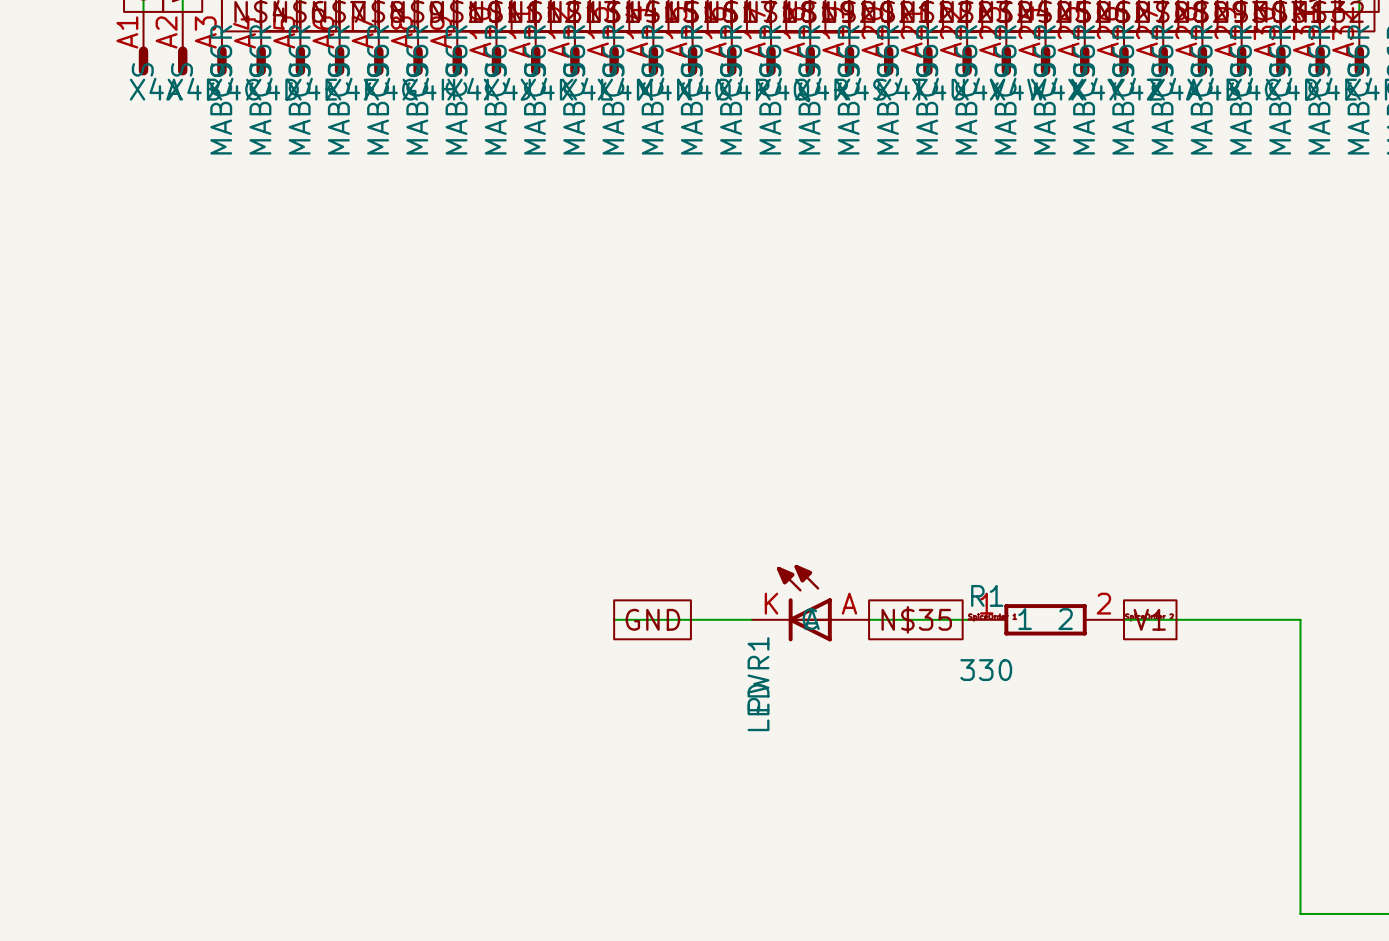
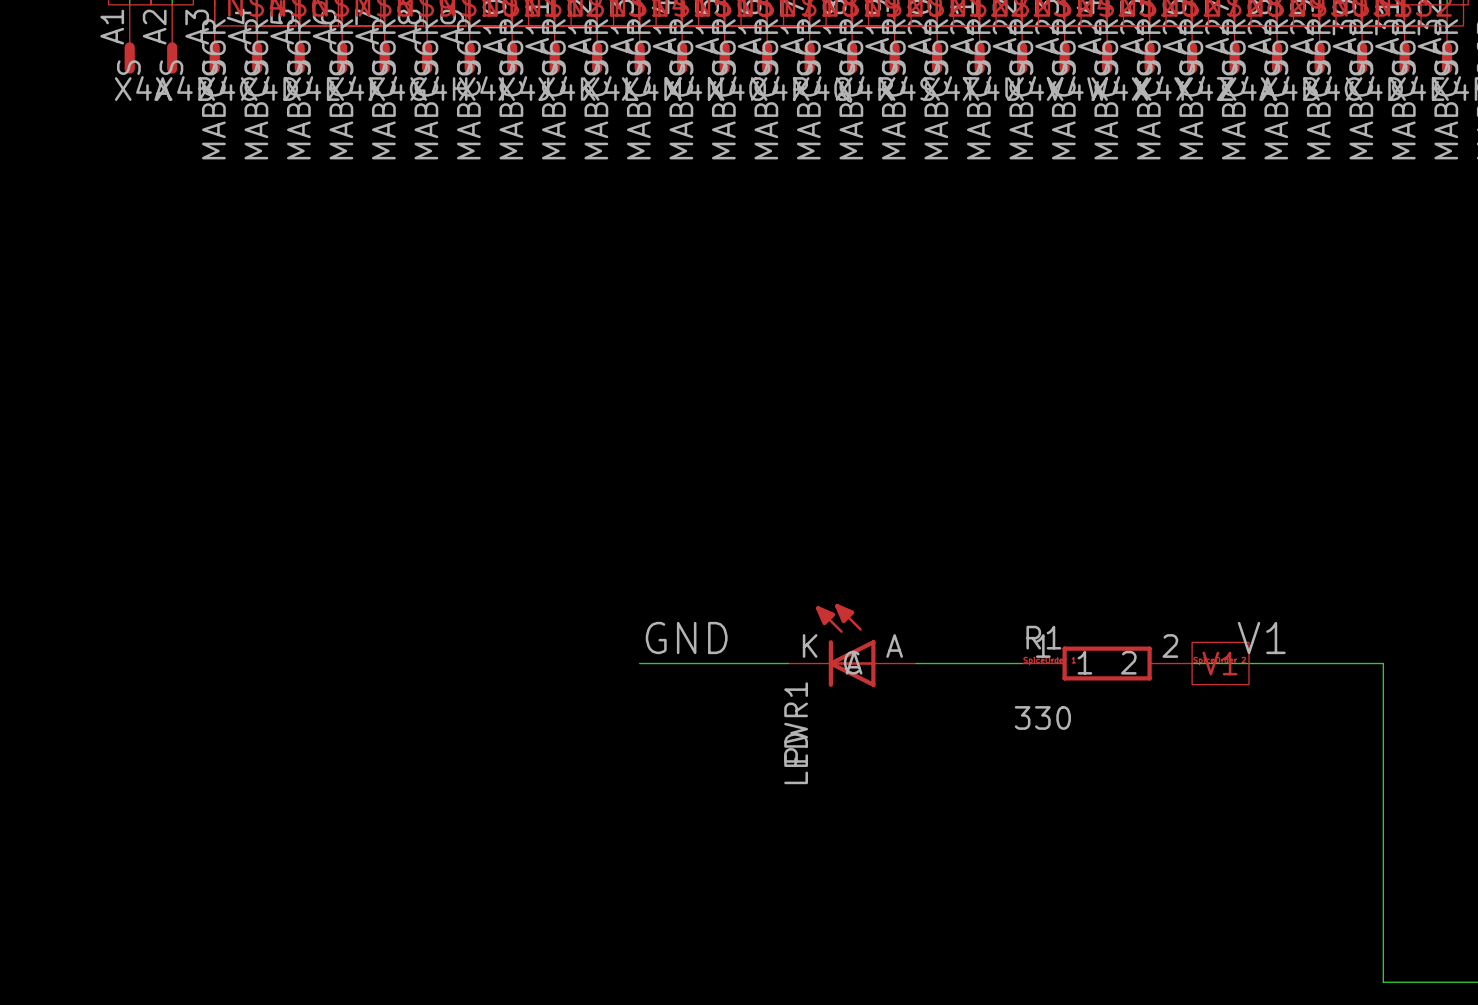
label: none -> GND (686, 637)
label: none -> V1 (1261, 637)
global label: GND (652, 619) -> none
global label: N$35 (916, 619) -> none

